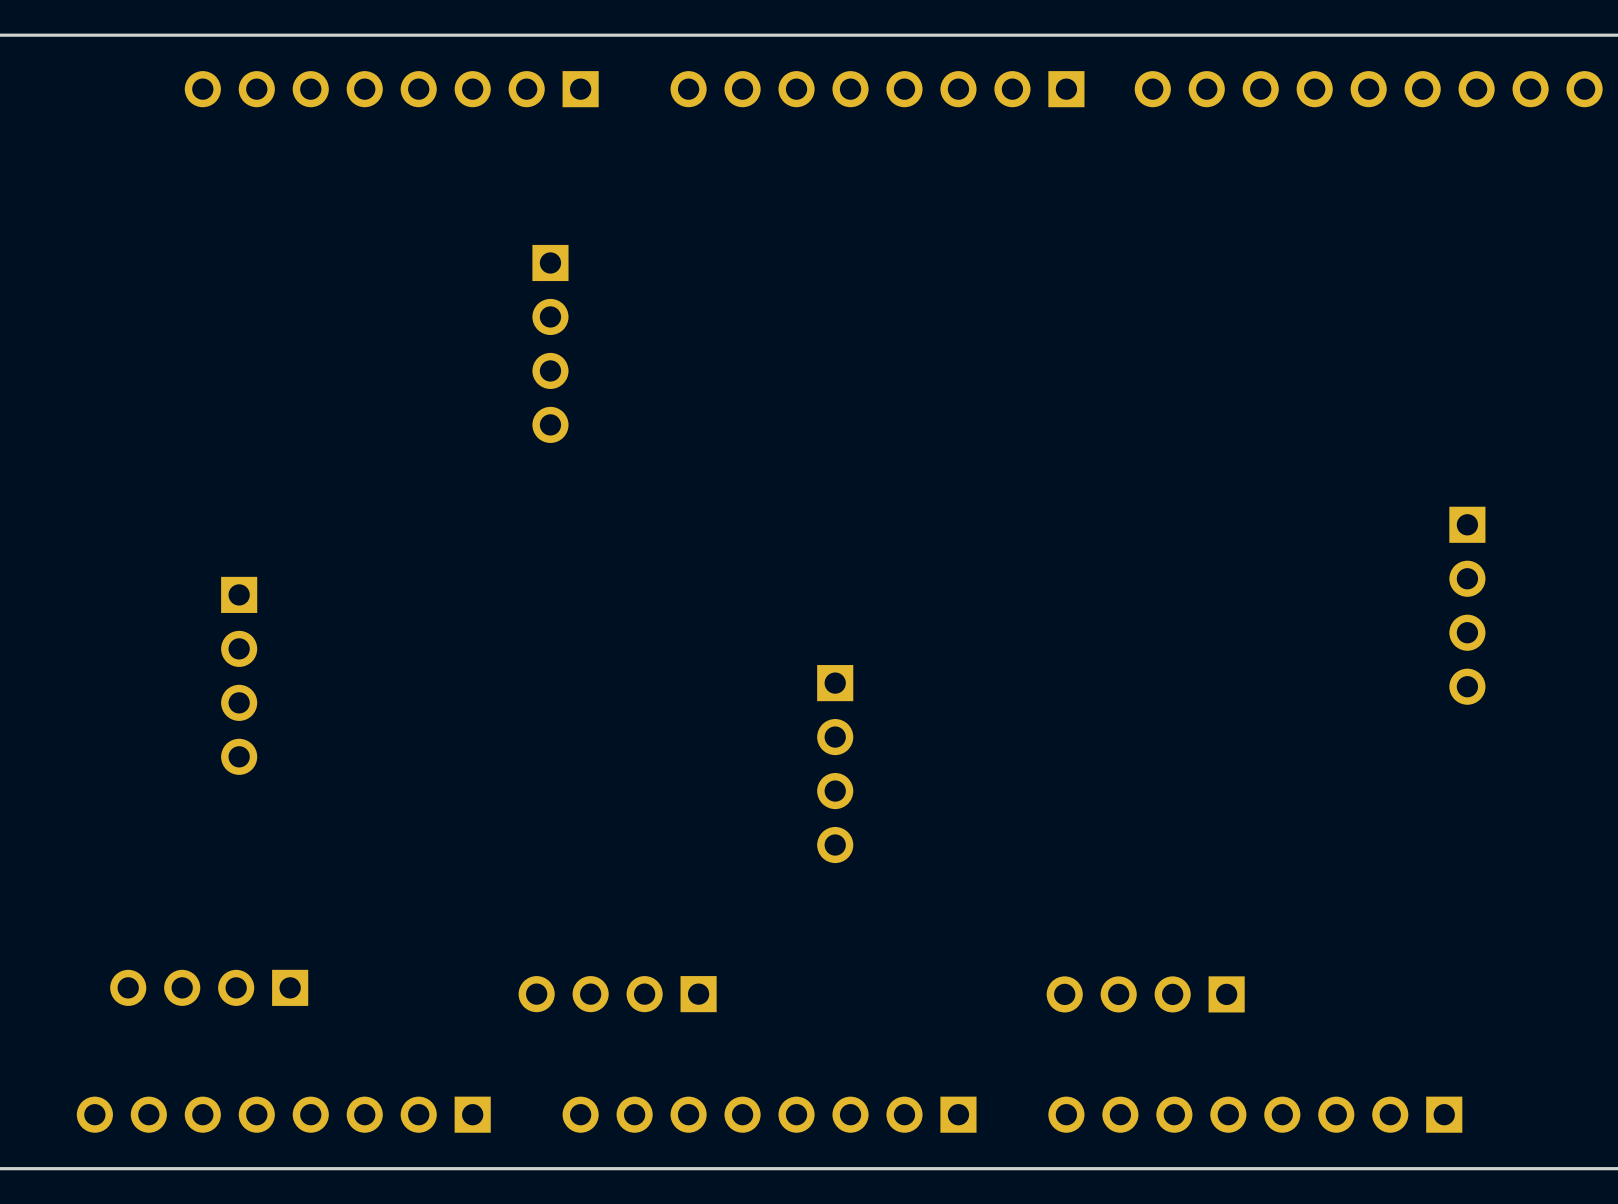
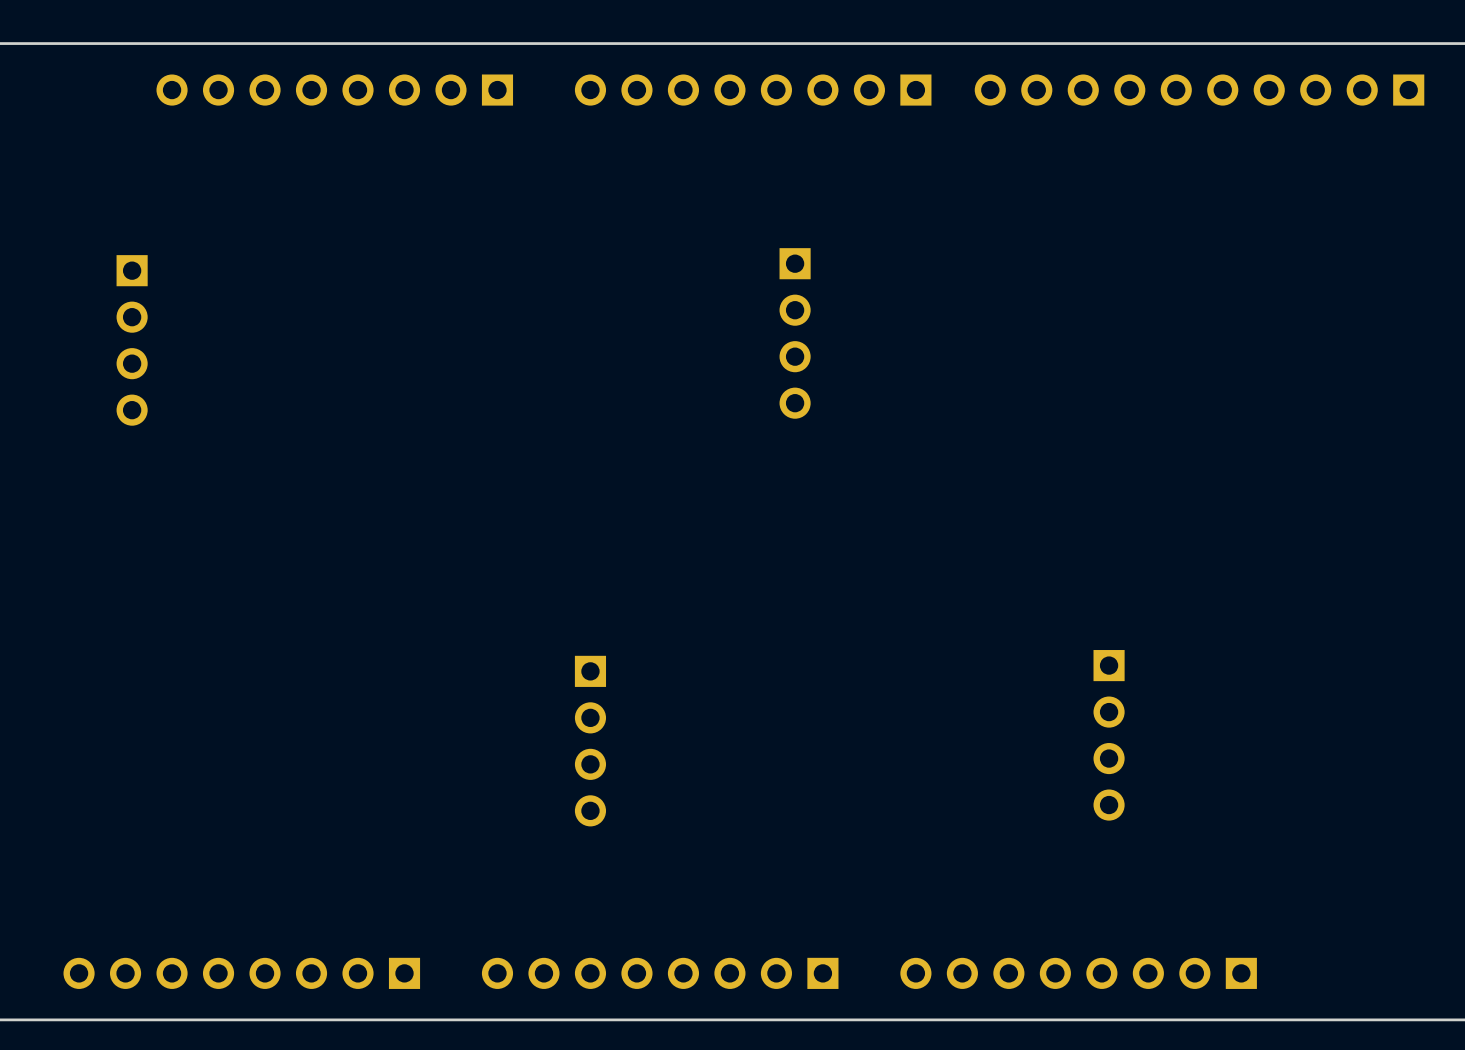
part: (550, 343) -> none
part: none -> (795, 333)
part: none -> (132, 340)
part: (1467, 605) -> none
part: (239, 675) -> none
part: (835, 764) -> none
part: none -> (1109, 735)
part: none -> (590, 741)
part: (209, 987) -> none
part: (617, 994) -> none
part: (1145, 994) -> none

